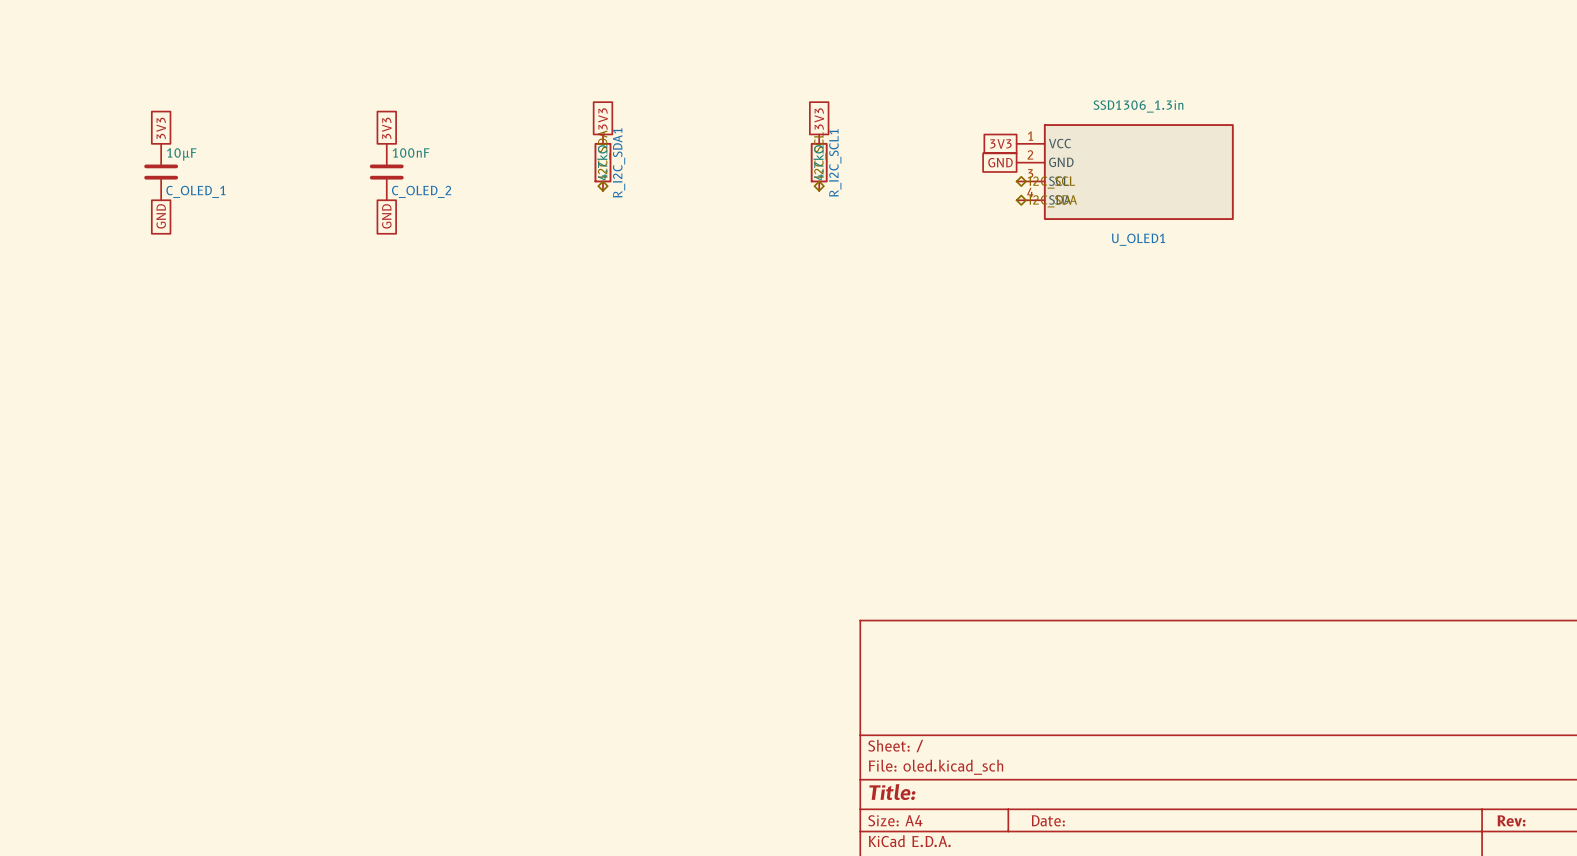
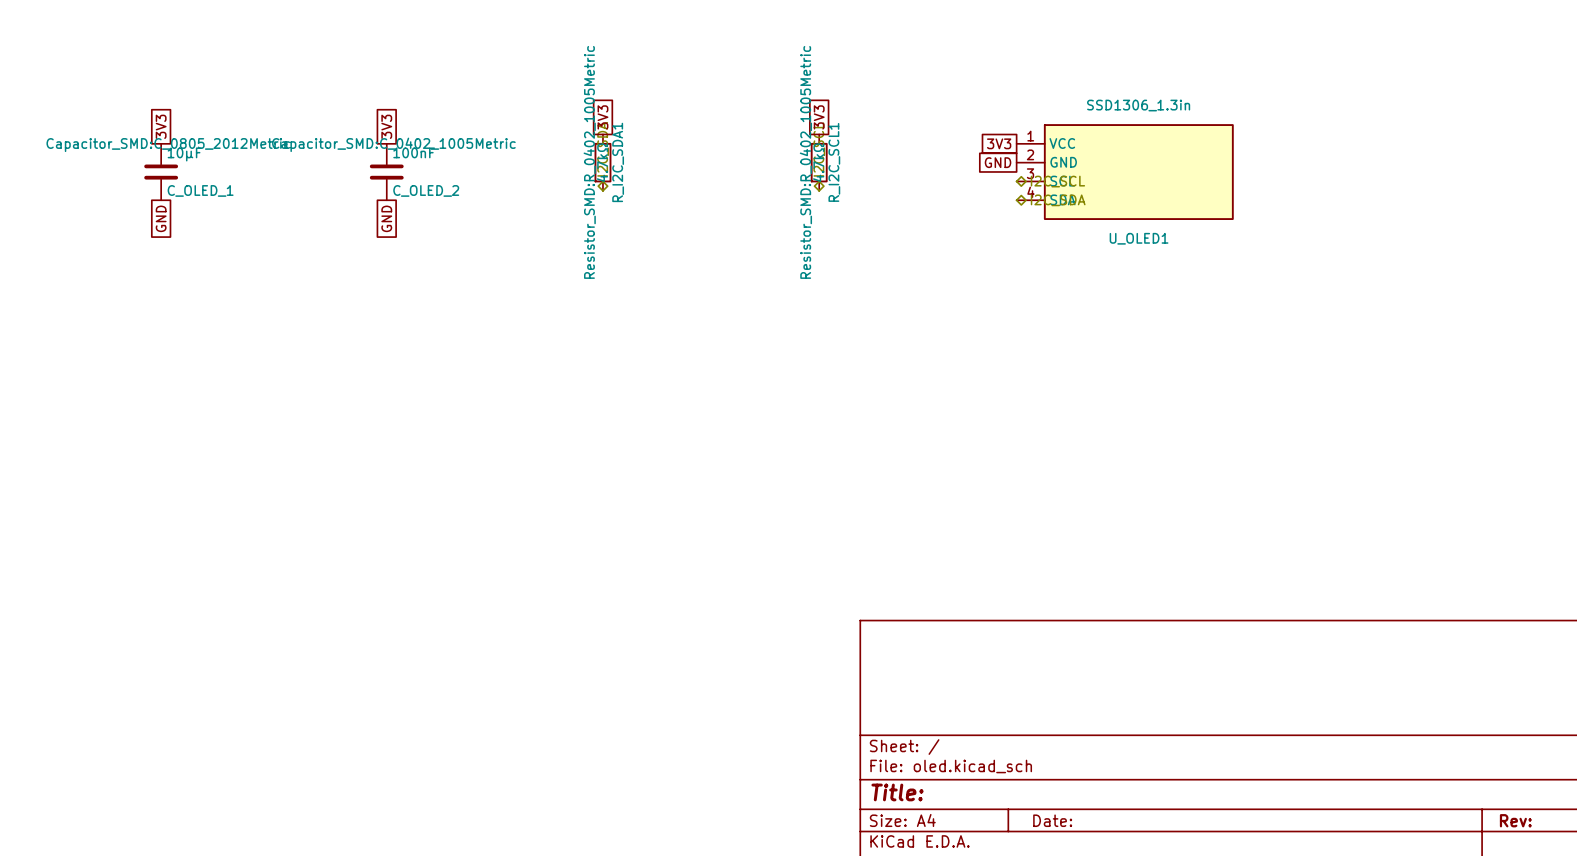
C_OLED_1 text: none -> Capacitor_SMD:C_0805_2012Metric (168, 145)
C_OLED_2 text: none -> Capacitor_SMD:C_0402_1005Metric (393, 144)
R_I2C_SDA1 text: none -> Resistor_SMD:R_0402_1005Metric (589, 162)
R_I2C_SCL1 text: none -> Resistor_SMD:R_0402_1005Metric (805, 162)

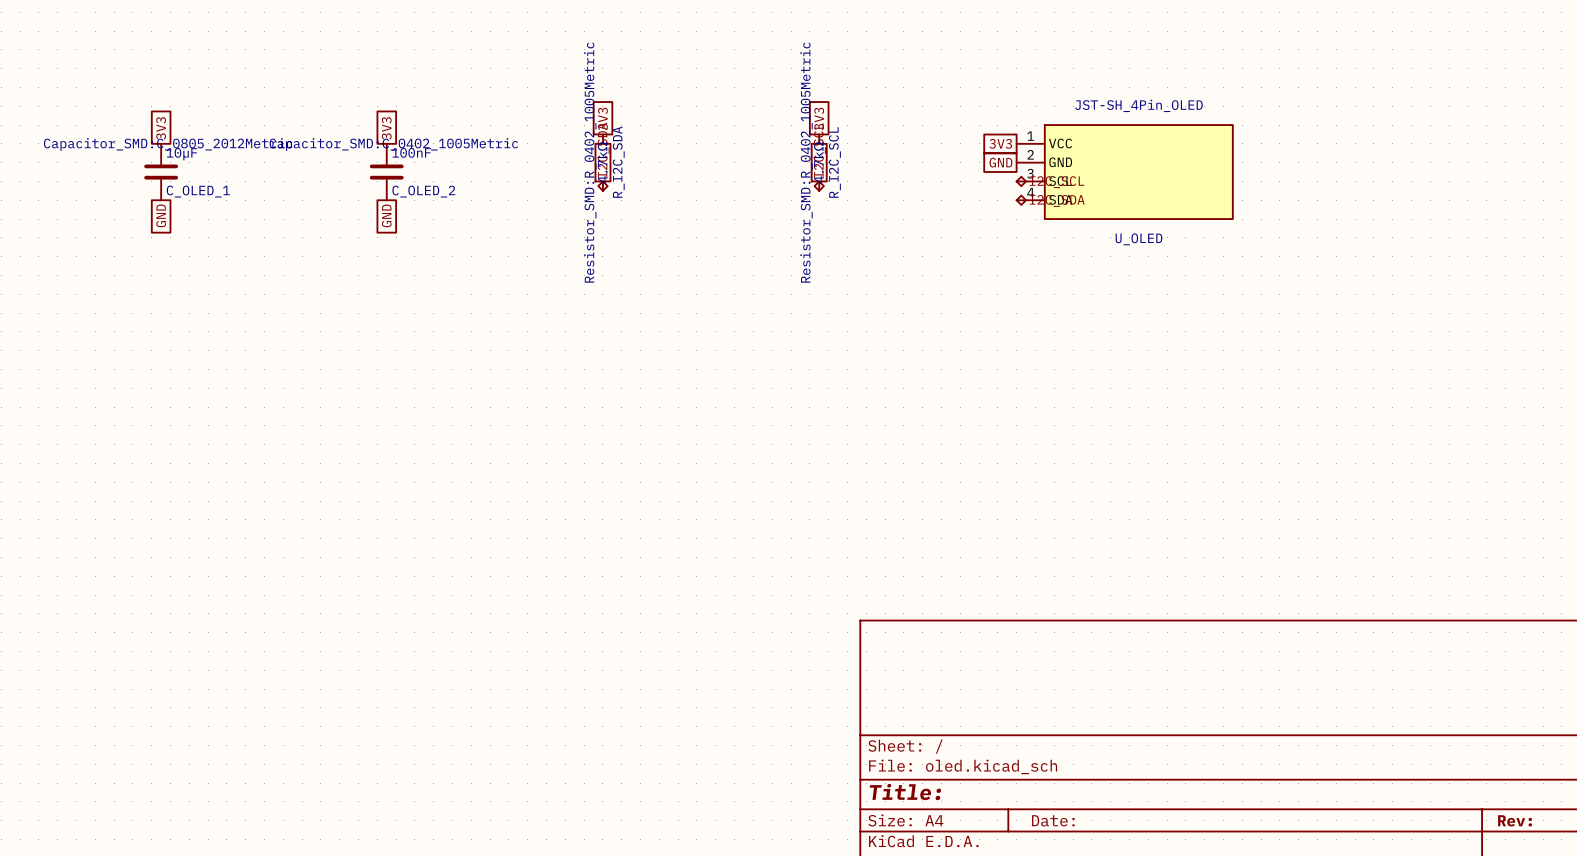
U_OLED1 value: SSD1306_1.3in (1138, 105) -> JST-SH_4Pin_OLED (1138, 105)
R_I2C_SDA1 name: R_I2C_SDA1 (618, 162) -> R_I2C_SDA (618, 162)
R_I2C_SCL1 name: R_I2C_SCL1 (834, 162) -> R_I2C_SCL (834, 162)
U_OLED1 name: U_OLED1 (1139, 238) -> U_OLED (1138, 239)

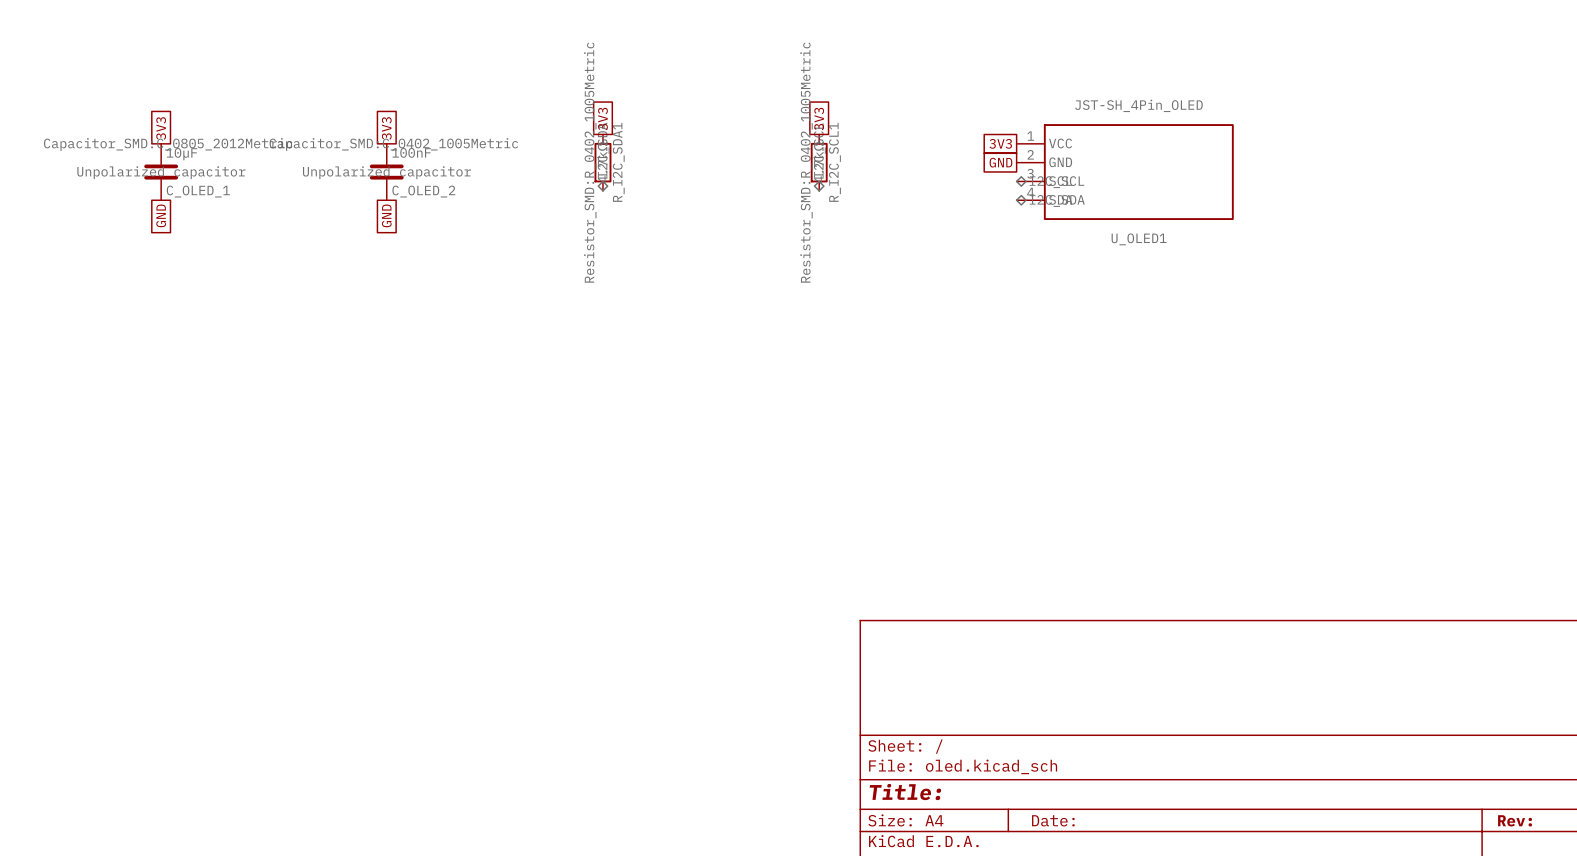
R_I2C_SDA name: R_I2C_SDA (618, 162) -> R_I2C_SDA1 (618, 162)
R_I2C_SCL name: R_I2C_SCL (834, 162) -> R_I2C_SCL1 (834, 162)
C_OLED_1 text: none -> Unpolarized capacitor (161, 172)
C_OLED_2 text: none -> Unpolarized capacitor (387, 172)
U_OLED name: U_OLED (1138, 239) -> U_OLED1 (1139, 239)

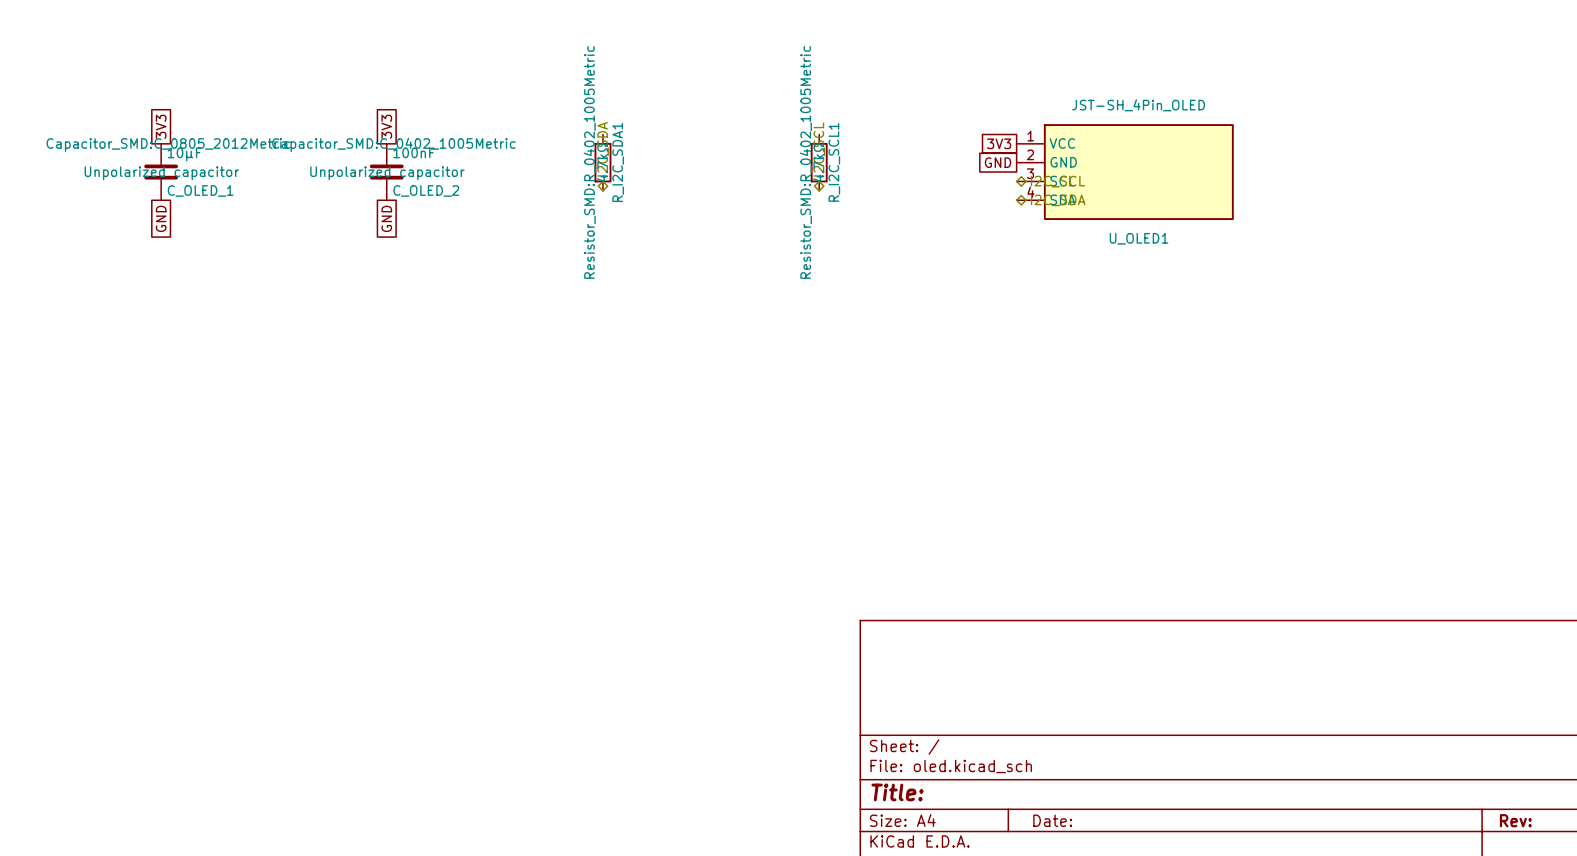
global label: 3V3 (602, 119) -> none
global label: 3V3 (819, 119) -> none

